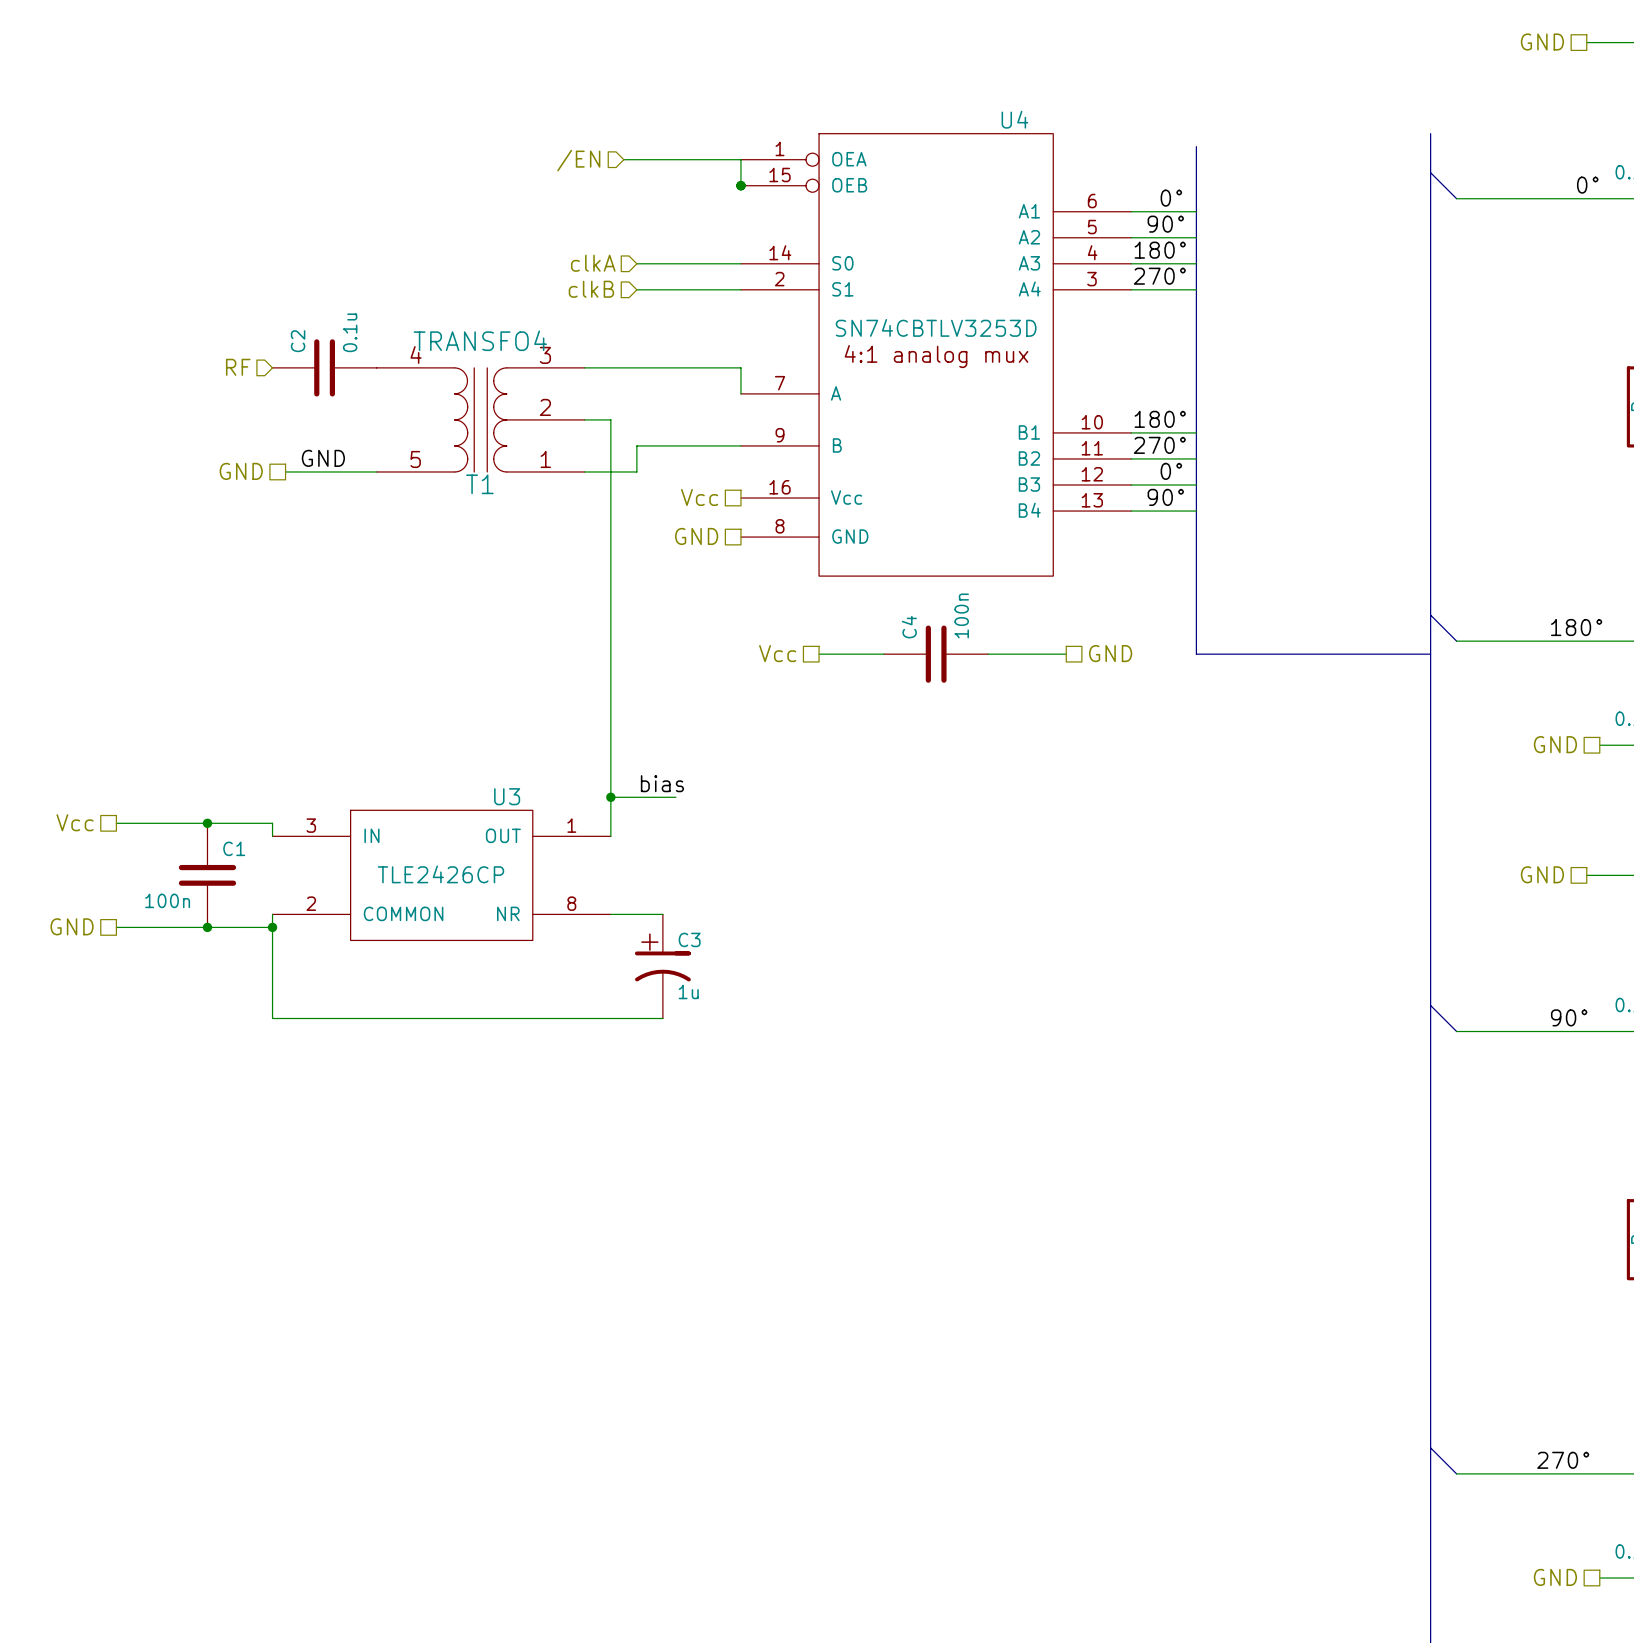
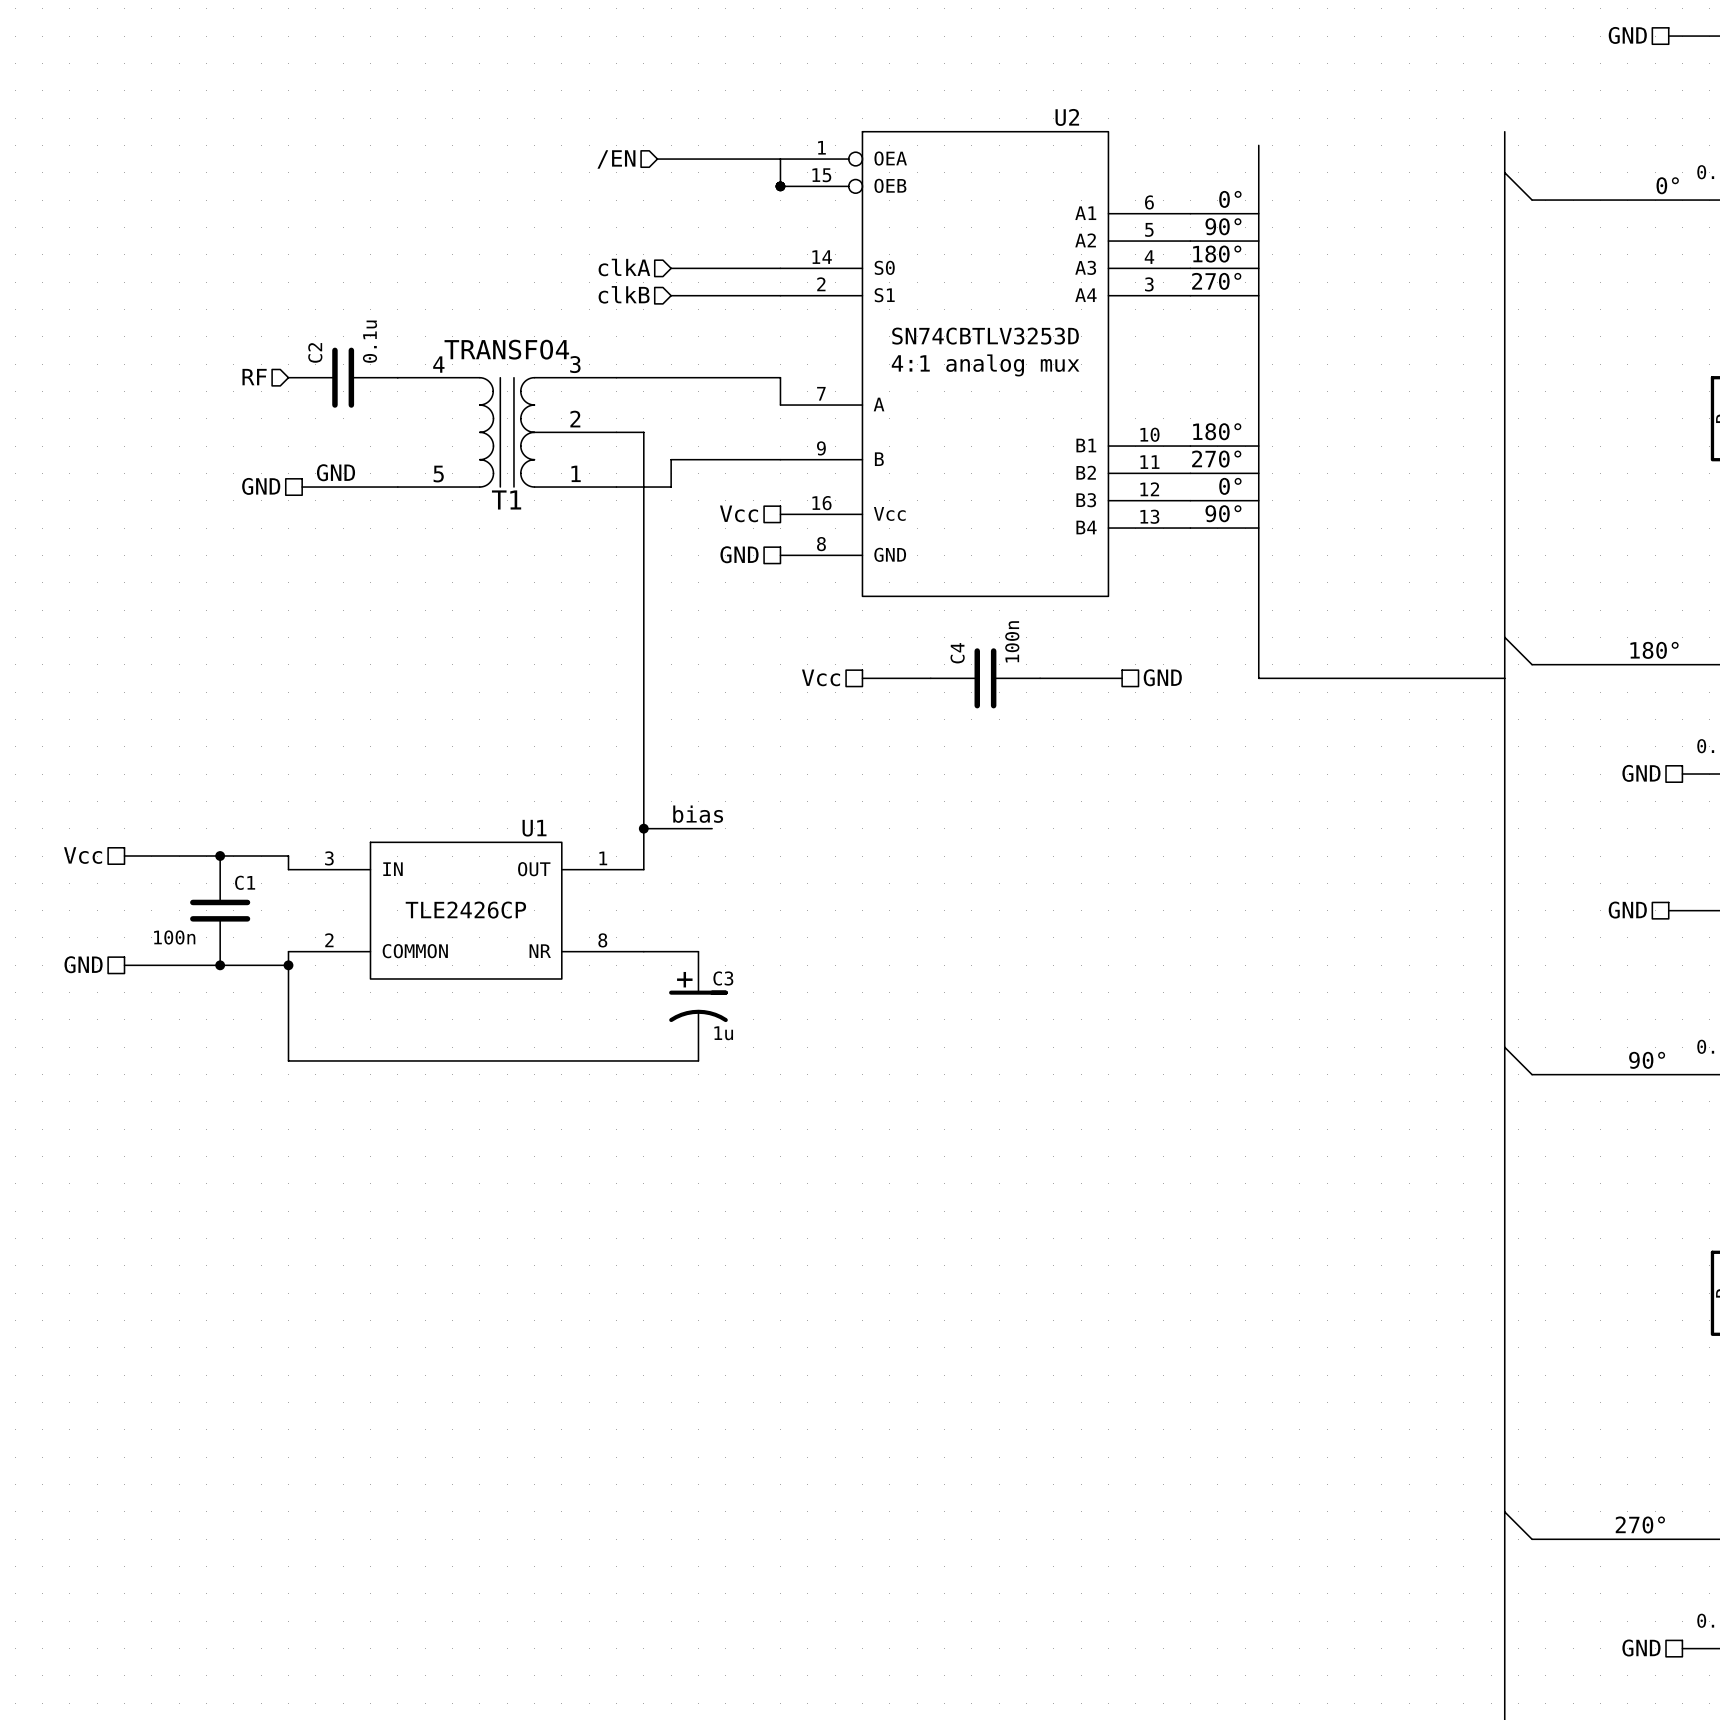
U4 name: U4 (1014, 119) -> U2 (1067, 117)
U3 name: U3 (507, 796) -> U1 (534, 828)

